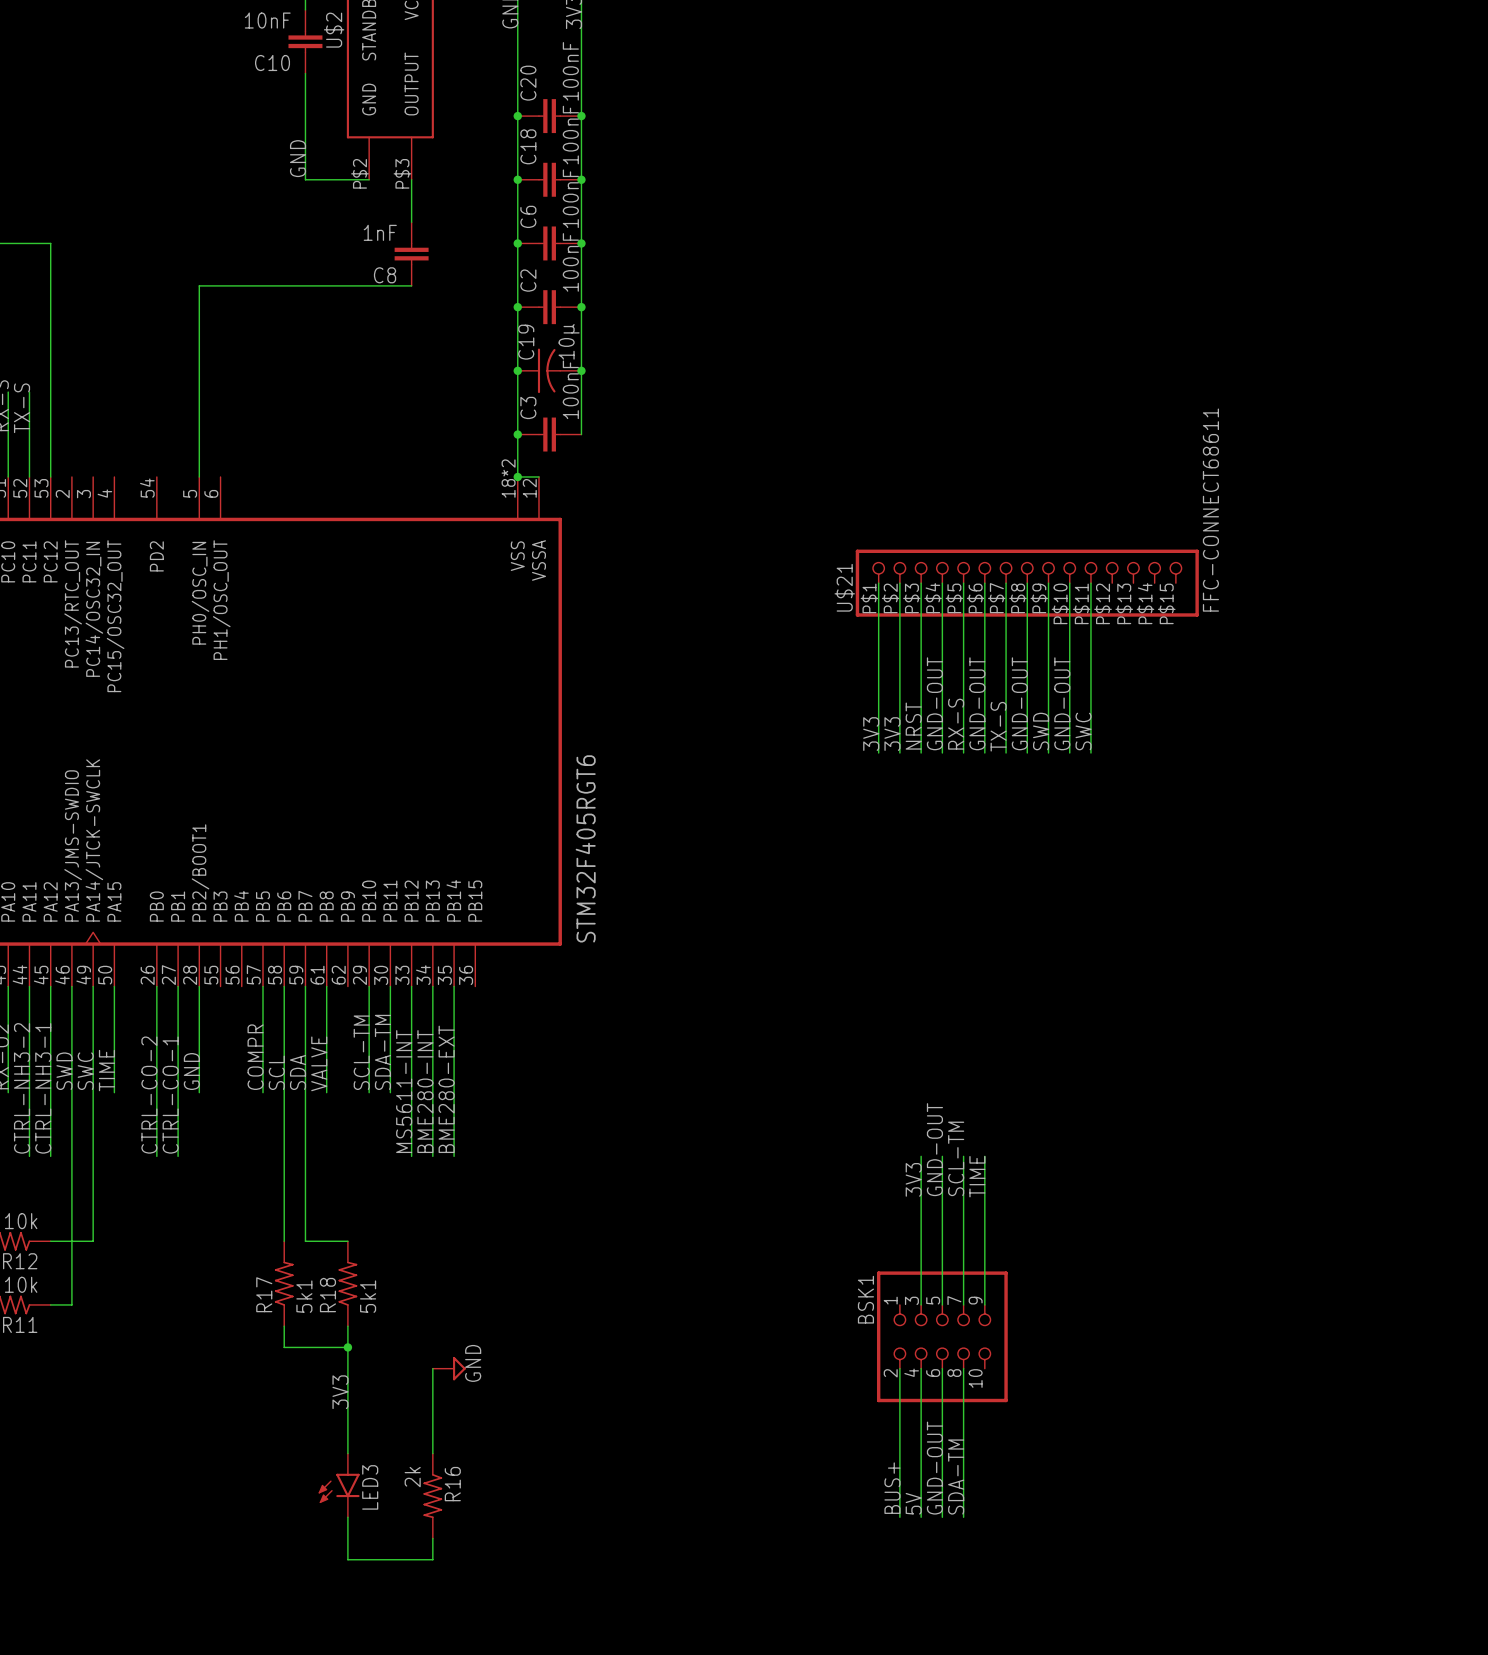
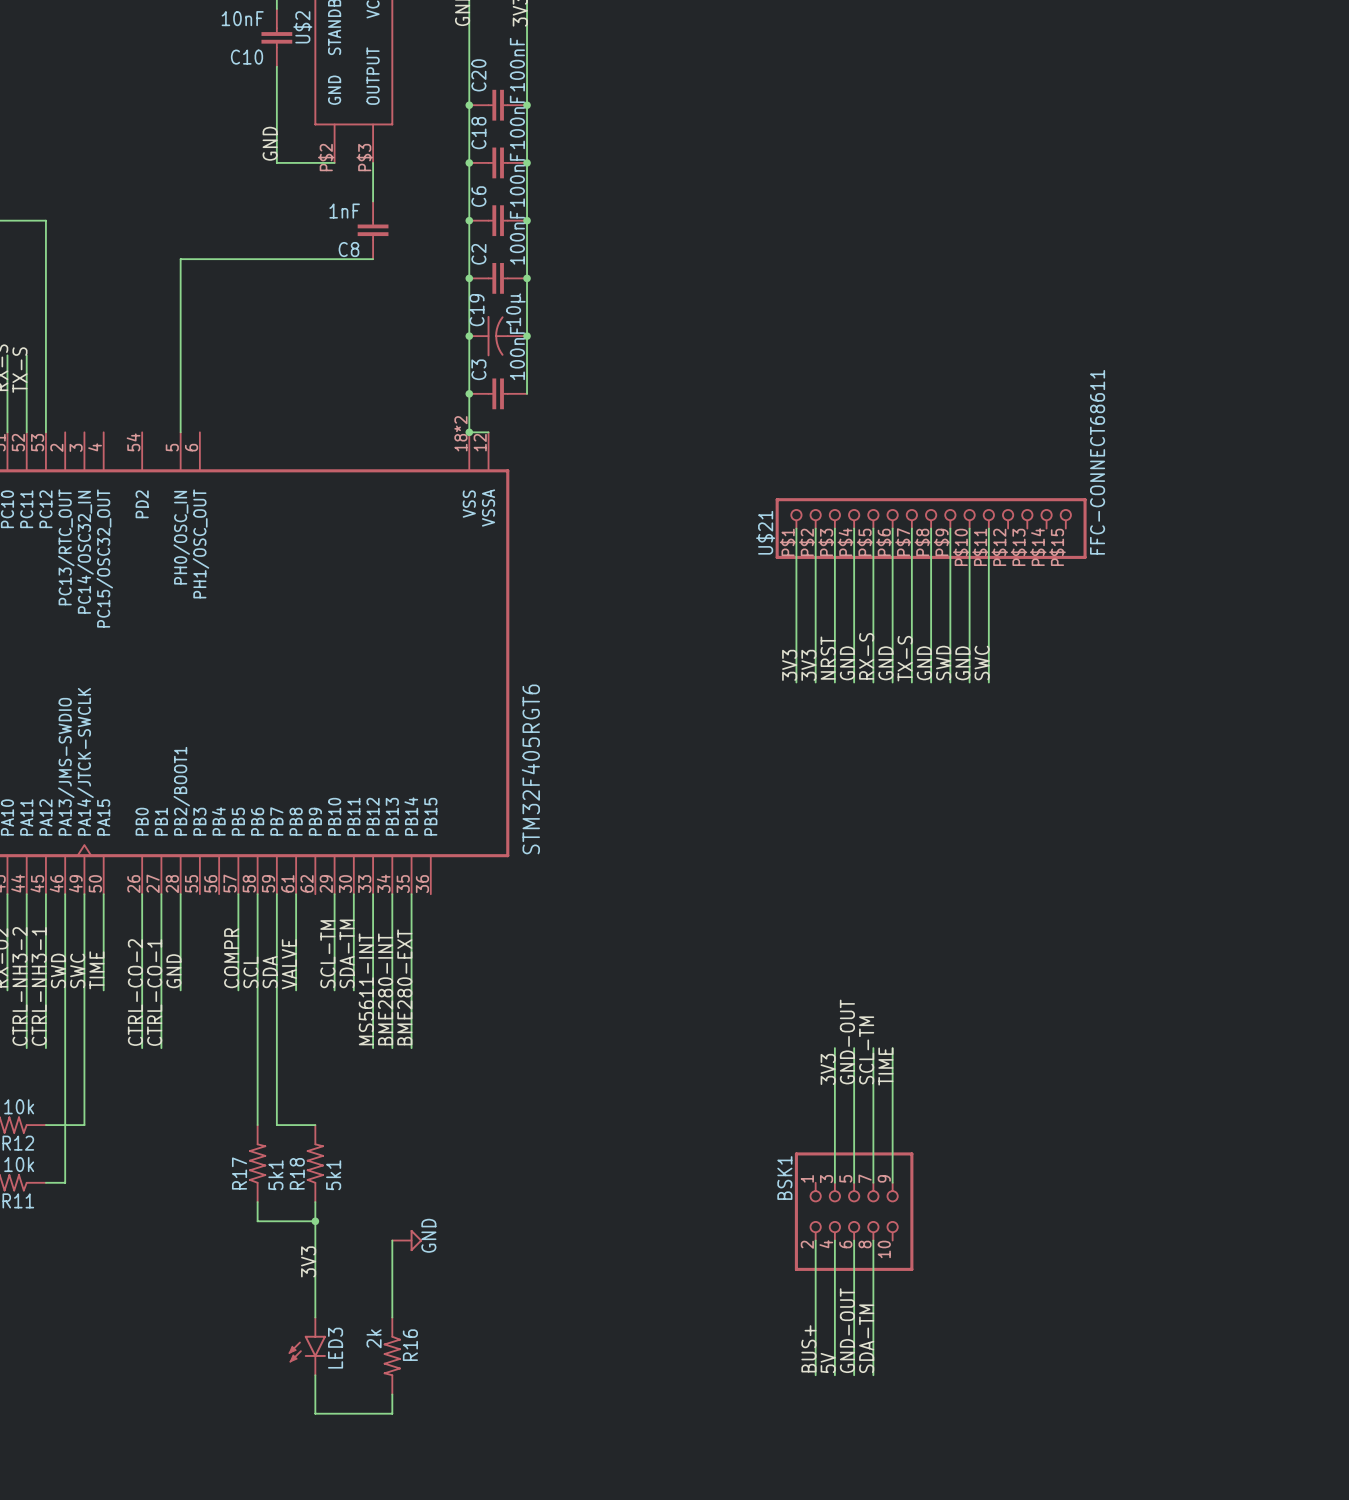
label: GND-OUT (934, 703) -> GND (847, 663)
label: GND-OUT (977, 703) -> GND (885, 663)
label: GND-OUT (1019, 703) -> GND (924, 663)
label: GND-OUT (1062, 703) -> GND (962, 663)

